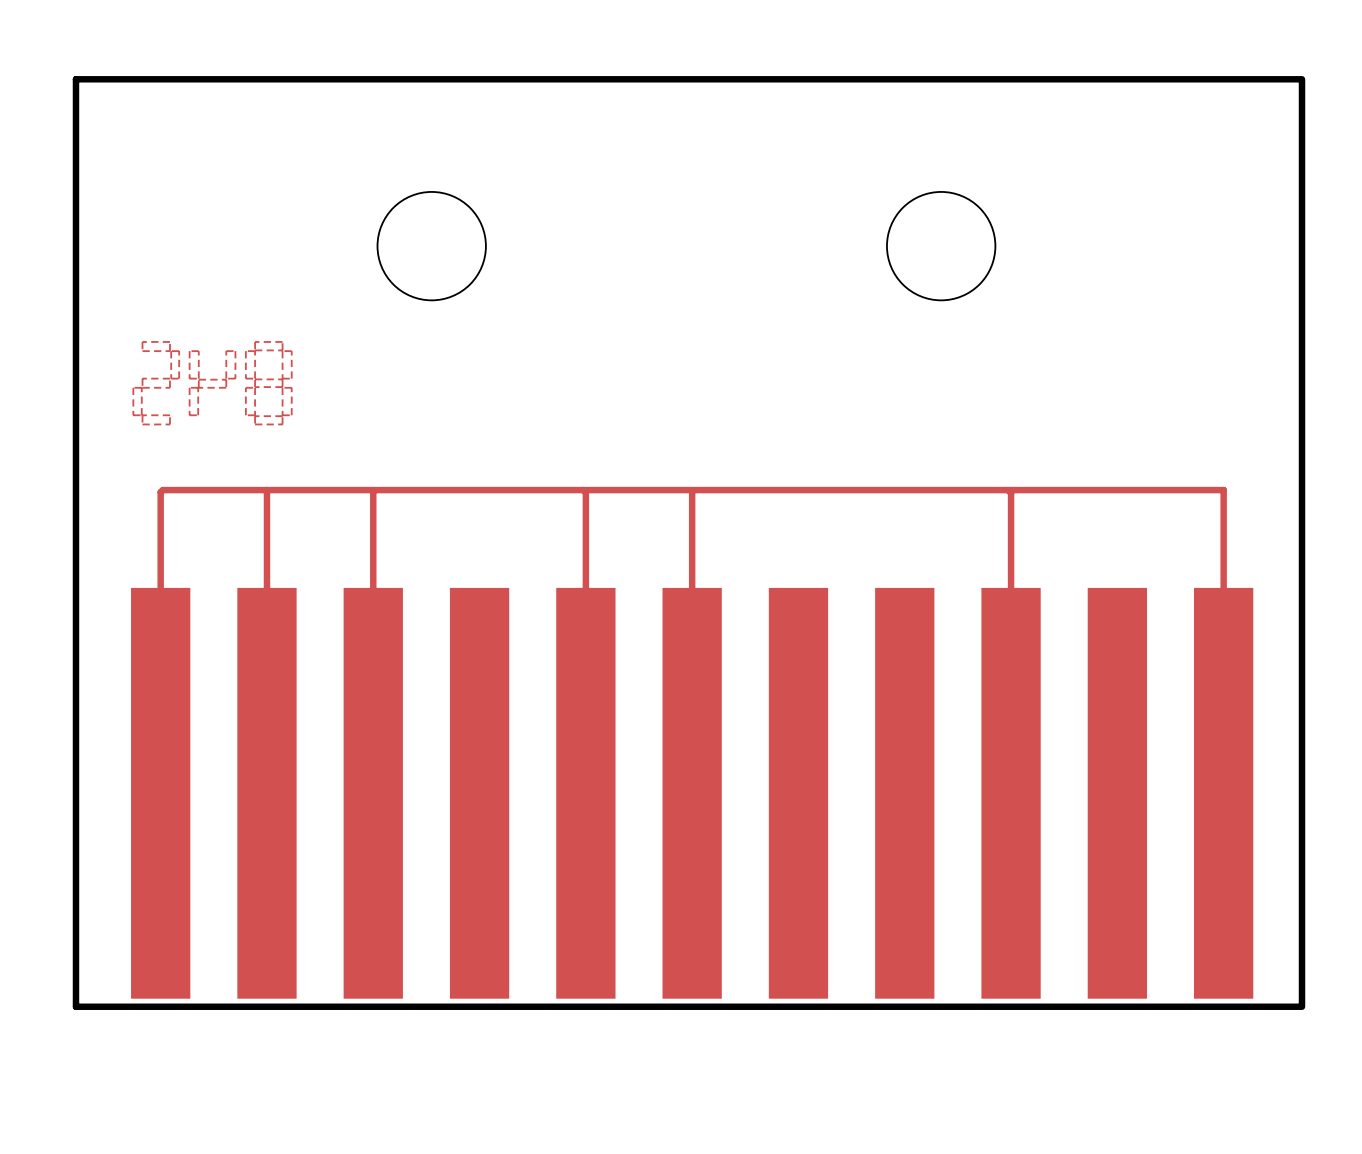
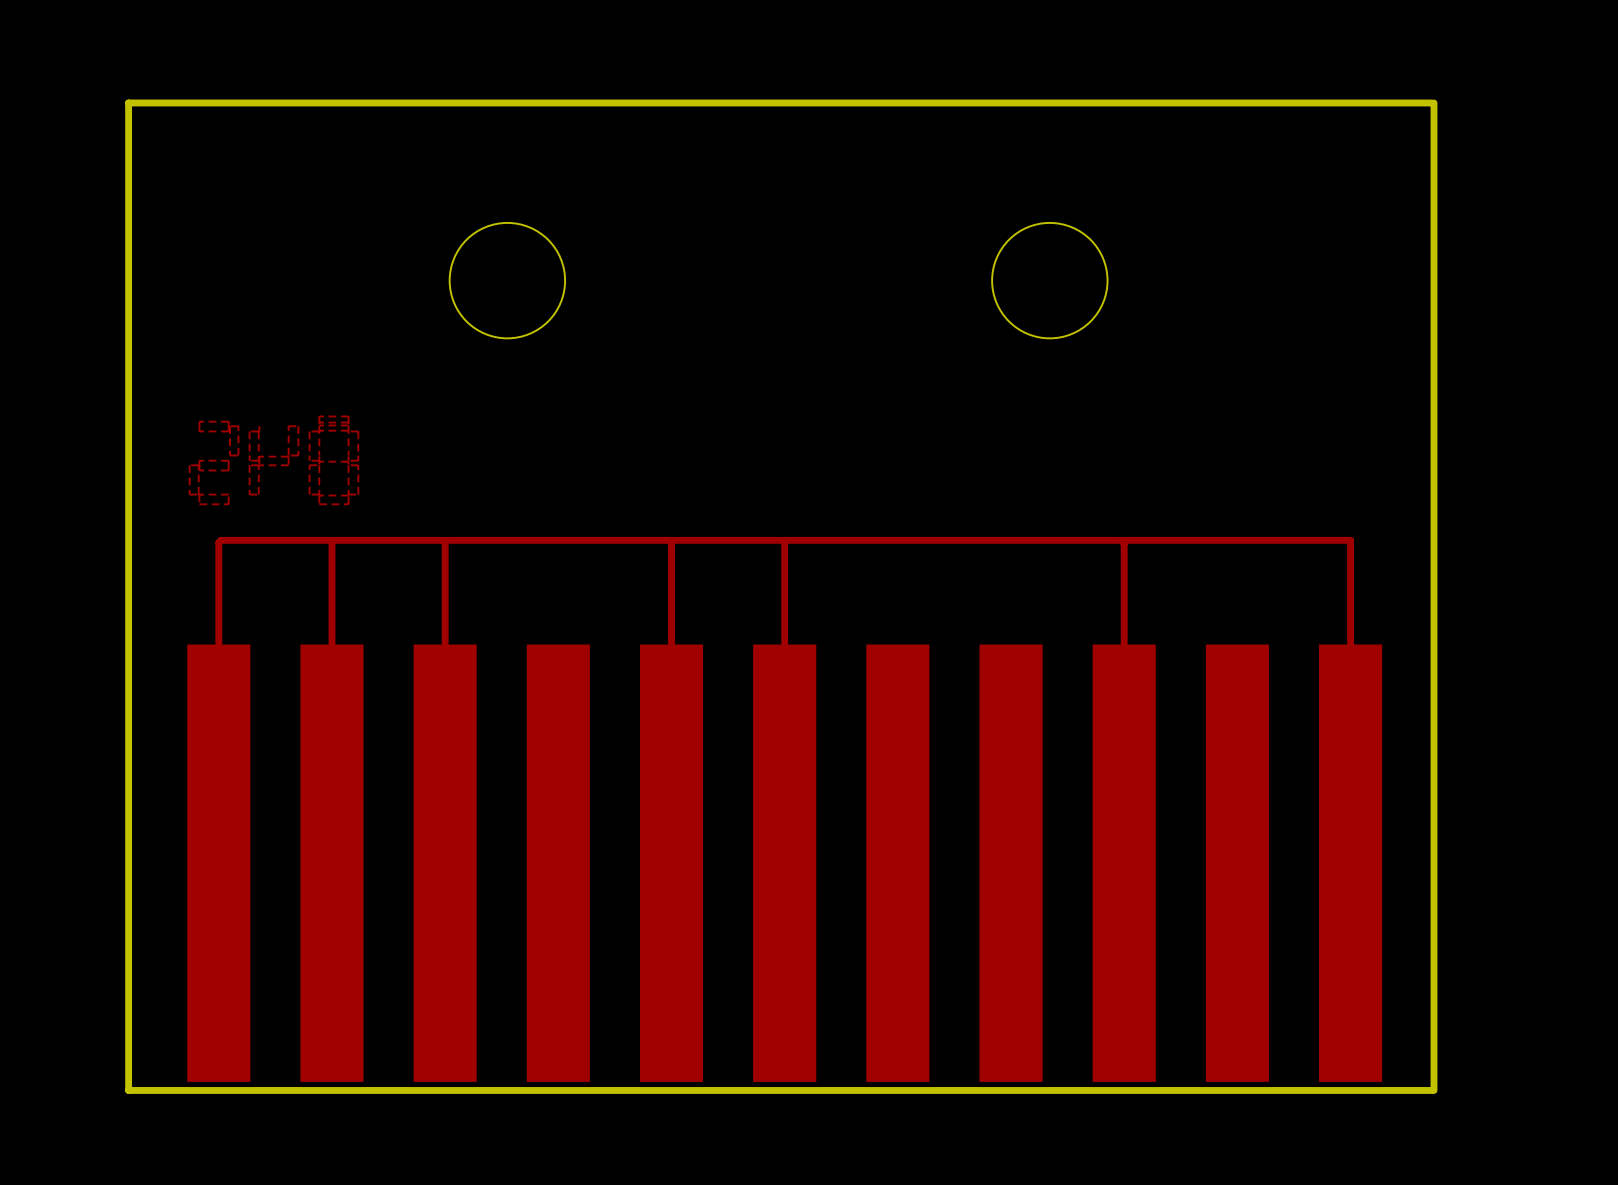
top zone outline: (170, 341) (142, 341) (142, 351) (170, 351) (170, 341) -> (228, 494) (199, 494) (199, 504) (228, 504) (228, 494)
top zone outline: (282, 341) (282, 350) (255, 350) (255, 341) (282, 341) -> (288, 456) (288, 465) (259, 465) (259, 456) (288, 456)
top zone outline: (179, 351) (171, 351) (171, 378) (179, 378) (179, 351) -> (238, 426) (229, 426) (229, 455) (238, 455) (238, 426)
top zone outline: (198, 351) (189, 351) (189, 378) (198, 378) (198, 351) -> (258, 465) (249, 465) (249, 494) (258, 494) (258, 465)
top zone outline: (235, 351) (226, 351) (226, 378) (235, 378) (235, 351) -> none
top zone outline: (255, 373) (255, 351) (245, 351) (245, 378) (255, 378) -> none
top zone outline: (282, 373) (282, 351) (291, 351) (291, 378) (282, 378) -> (348, 416) (319, 416)
top zone outline: (226, 382) (226, 379) (198, 379) (198, 382) -> (288, 426) (298, 426) (298, 455) (288, 455) (288, 431)
top zone outline: (141, 387) (133, 387) (133, 415) (141, 415) (141, 387) -> (198, 465) (189, 465) (189, 494) (198, 494) (198, 465)
top zone outline: (226, 387) (198, 387) -> (348, 425) (319, 425)
top zone outline: none -> (319, 465) (309, 465) (309, 494) (319, 494) (319, 470)
top zone outline: (282, 424) (255, 424) -> (348, 470) (348, 494) (358, 494) (358, 465) (348, 465)
top zone outline: none -> (348, 495) (348, 504) (319, 504) (319, 495) (348, 495)

